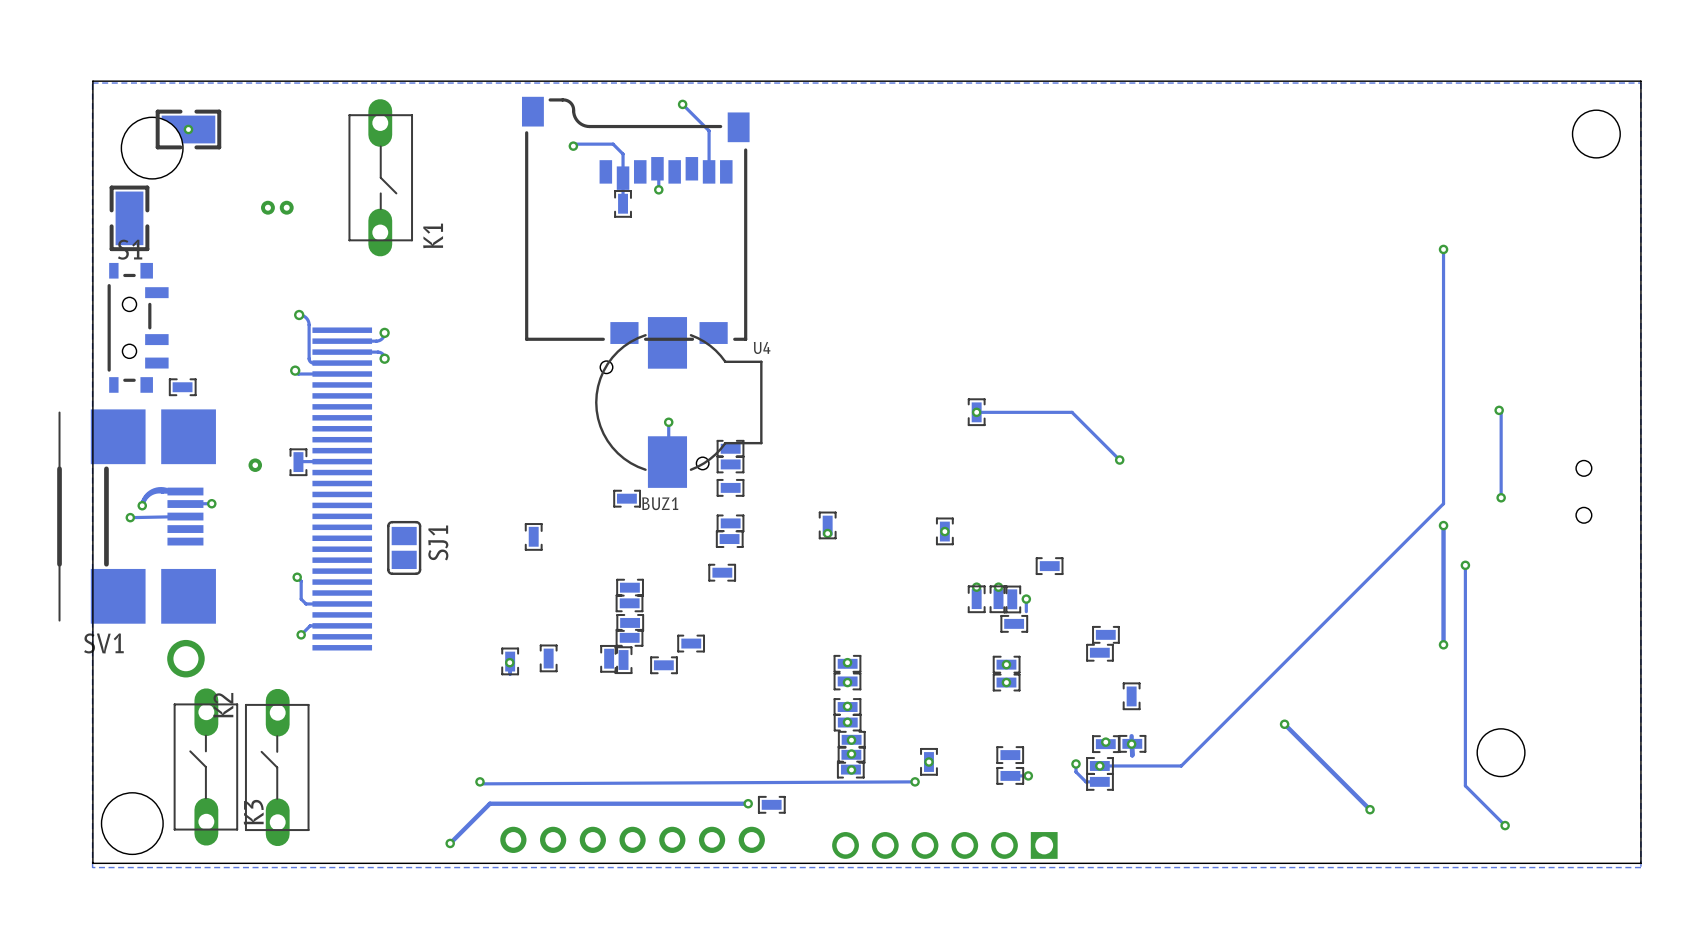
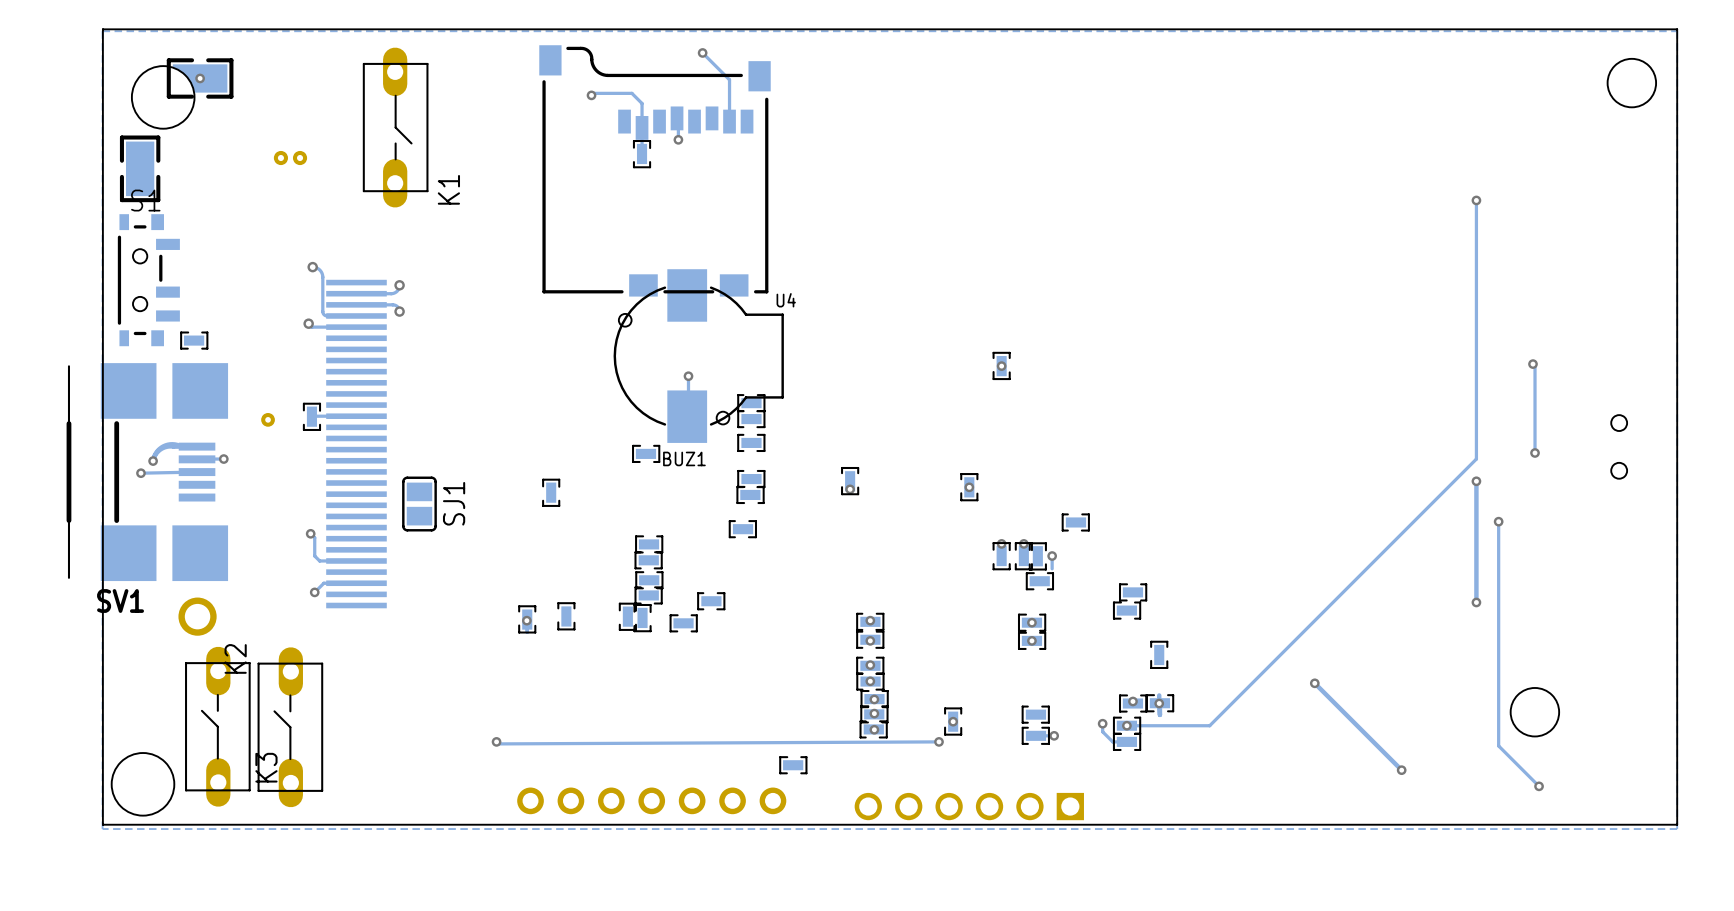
track: (976, 412) (1072, 412) (1119, 460) -> none
via: (1119, 460) -> none
track: (748, 803) (489, 803) (450, 843) -> none
via: (748, 803) -> none
via: (450, 843) -> none

